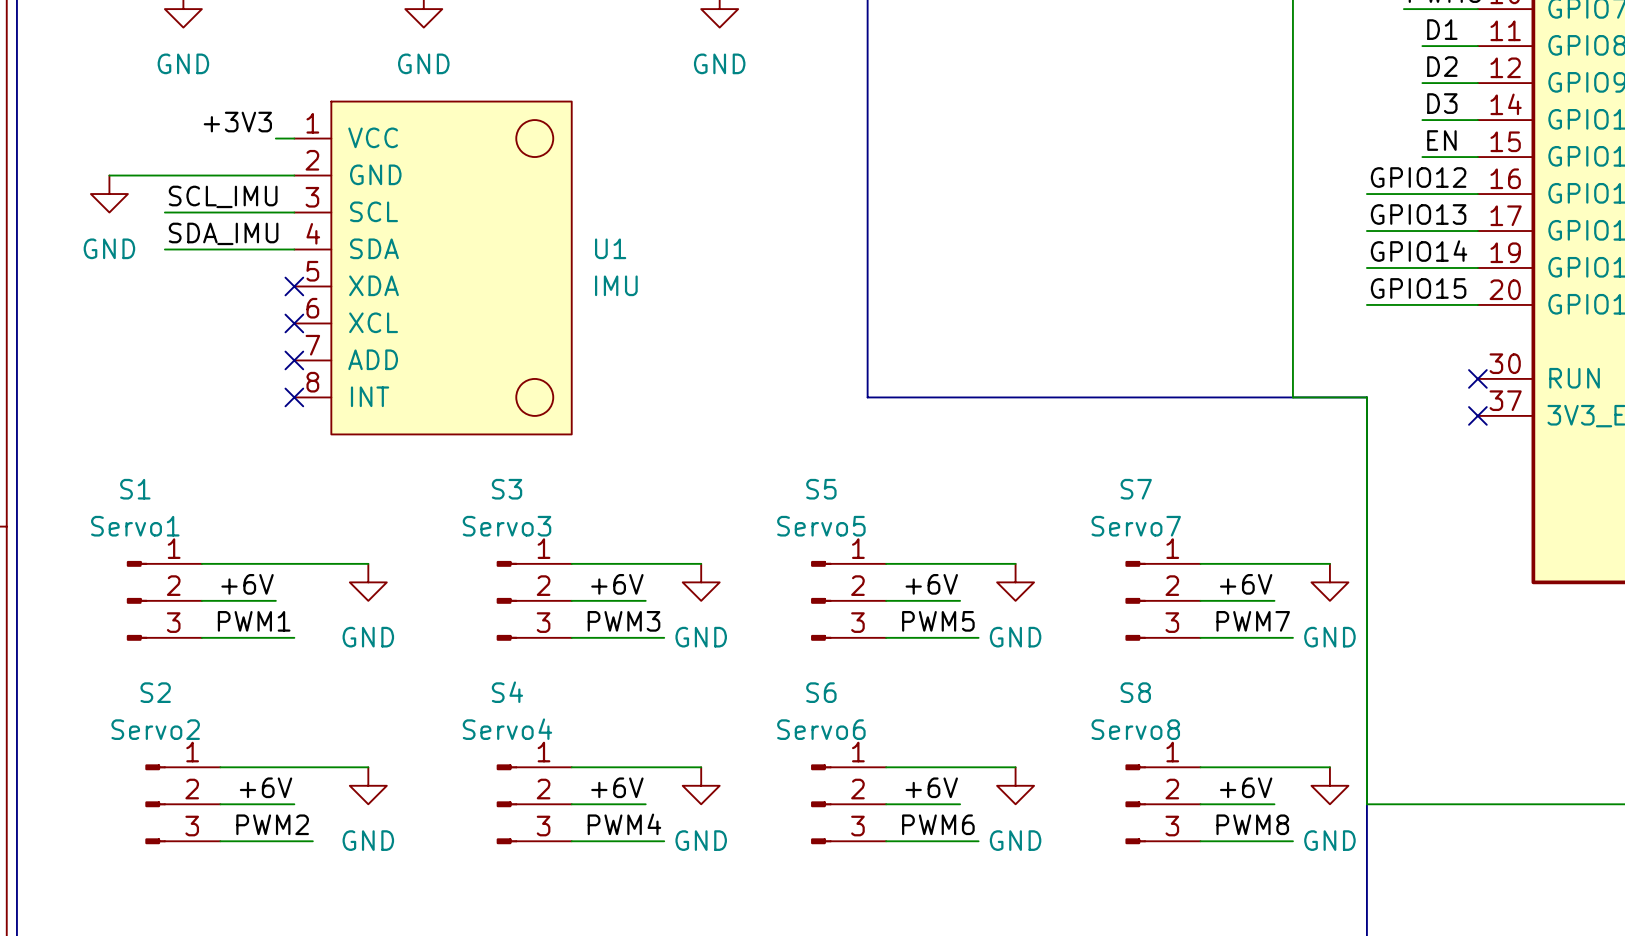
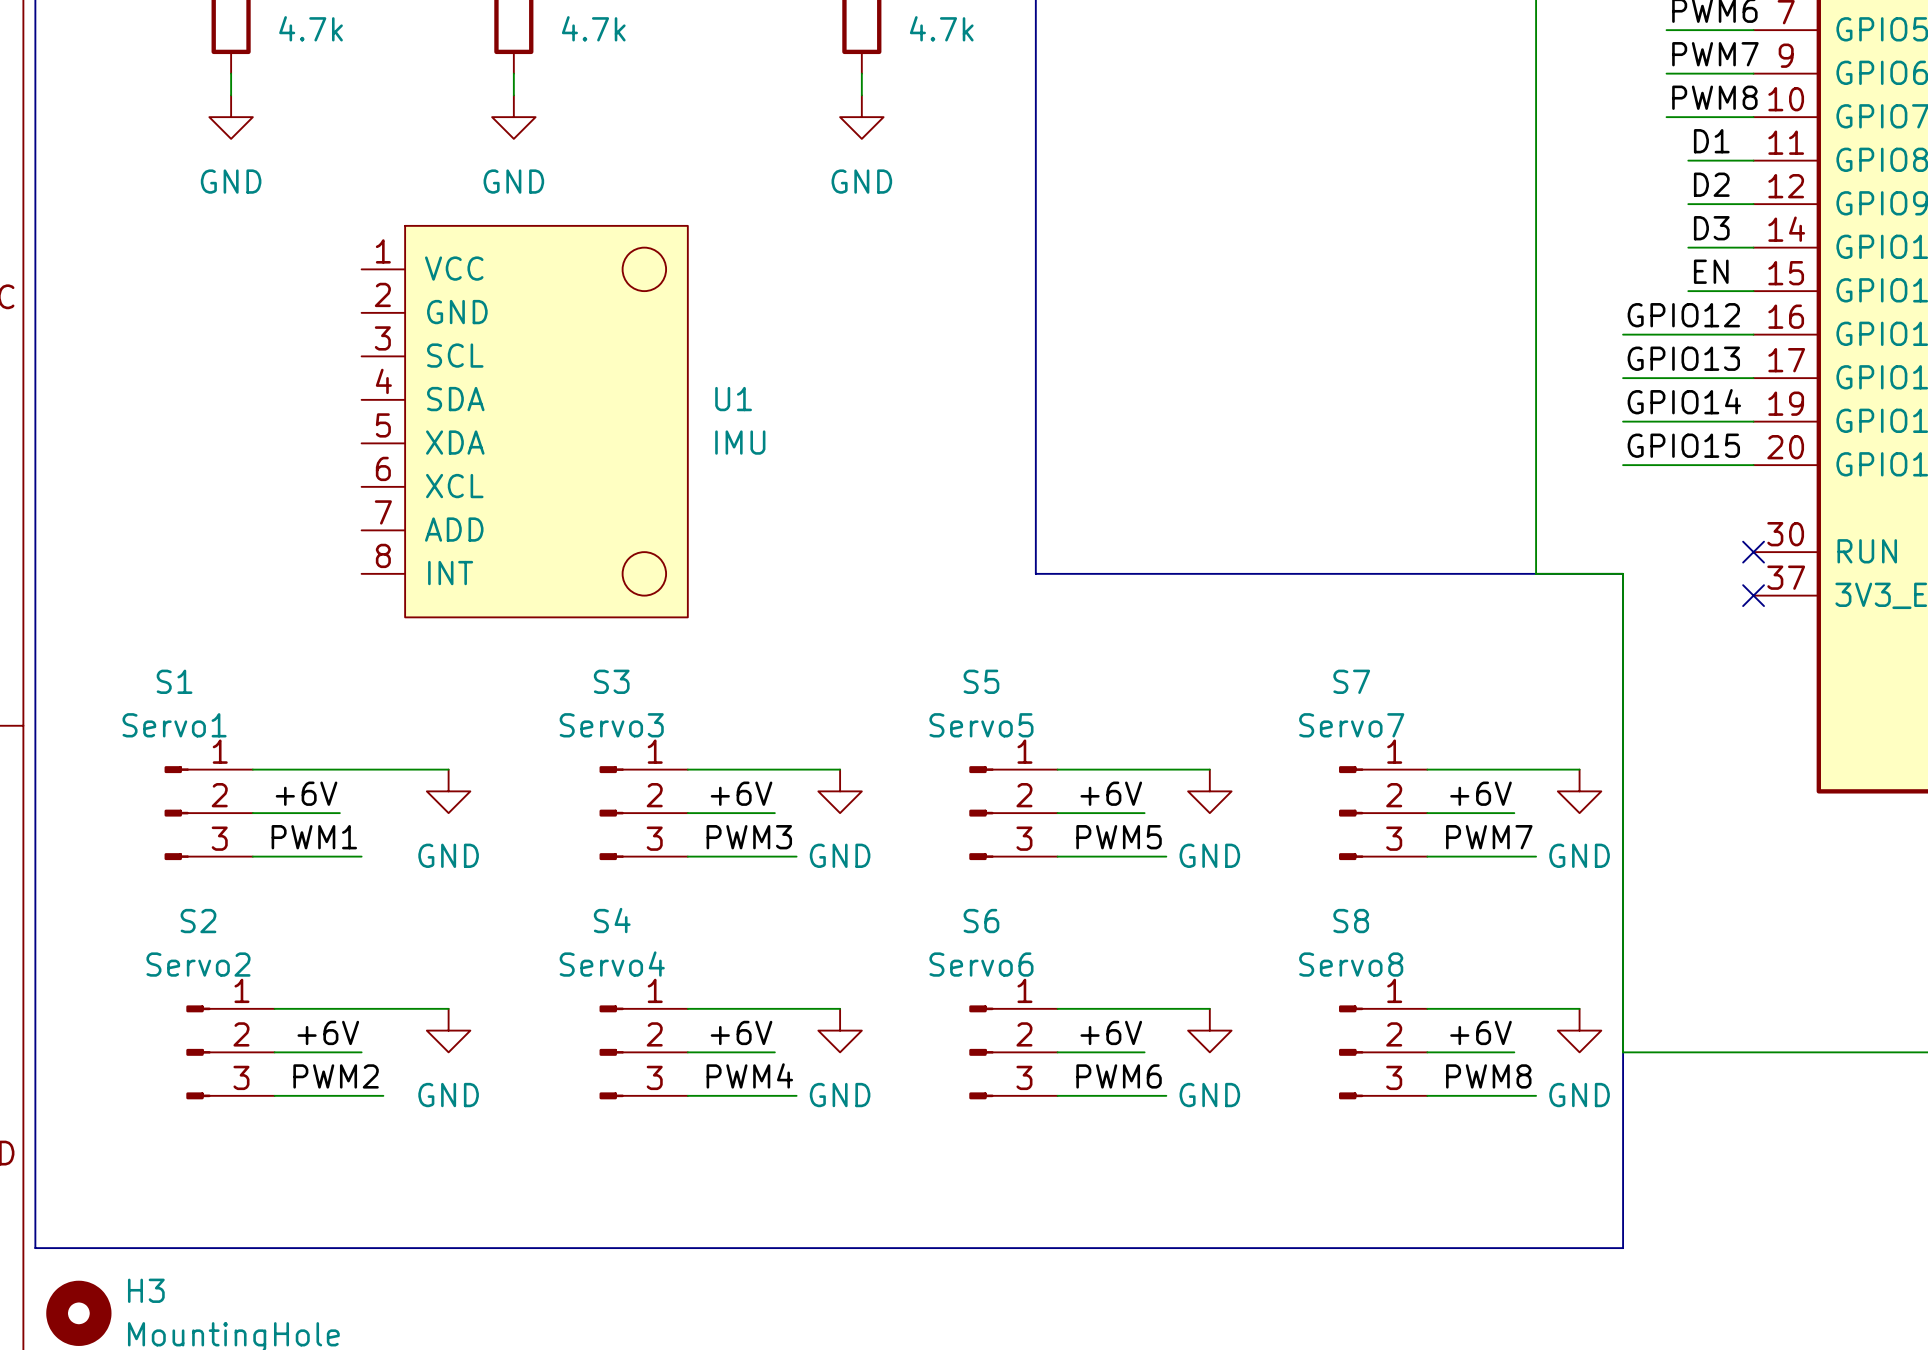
label: +3V3 (237, 122) -> none
wire: (275, 138) (294, 138) -> none
wire: (109, 175) (294, 175) -> none
power symbol: GND (109, 194) -> none
label: SCL_IMU (223, 196) -> none
wire: (164, 212) (294, 212) -> none
label: SDA_IMU (223, 233) -> none
wire: (164, 249) (294, 249) -> none
no-connect mark: (294, 286) -> none
no-connect mark: (294, 323) -> none
no-connect mark: (294, 360) -> none
no-connect mark: (294, 397) -> none

